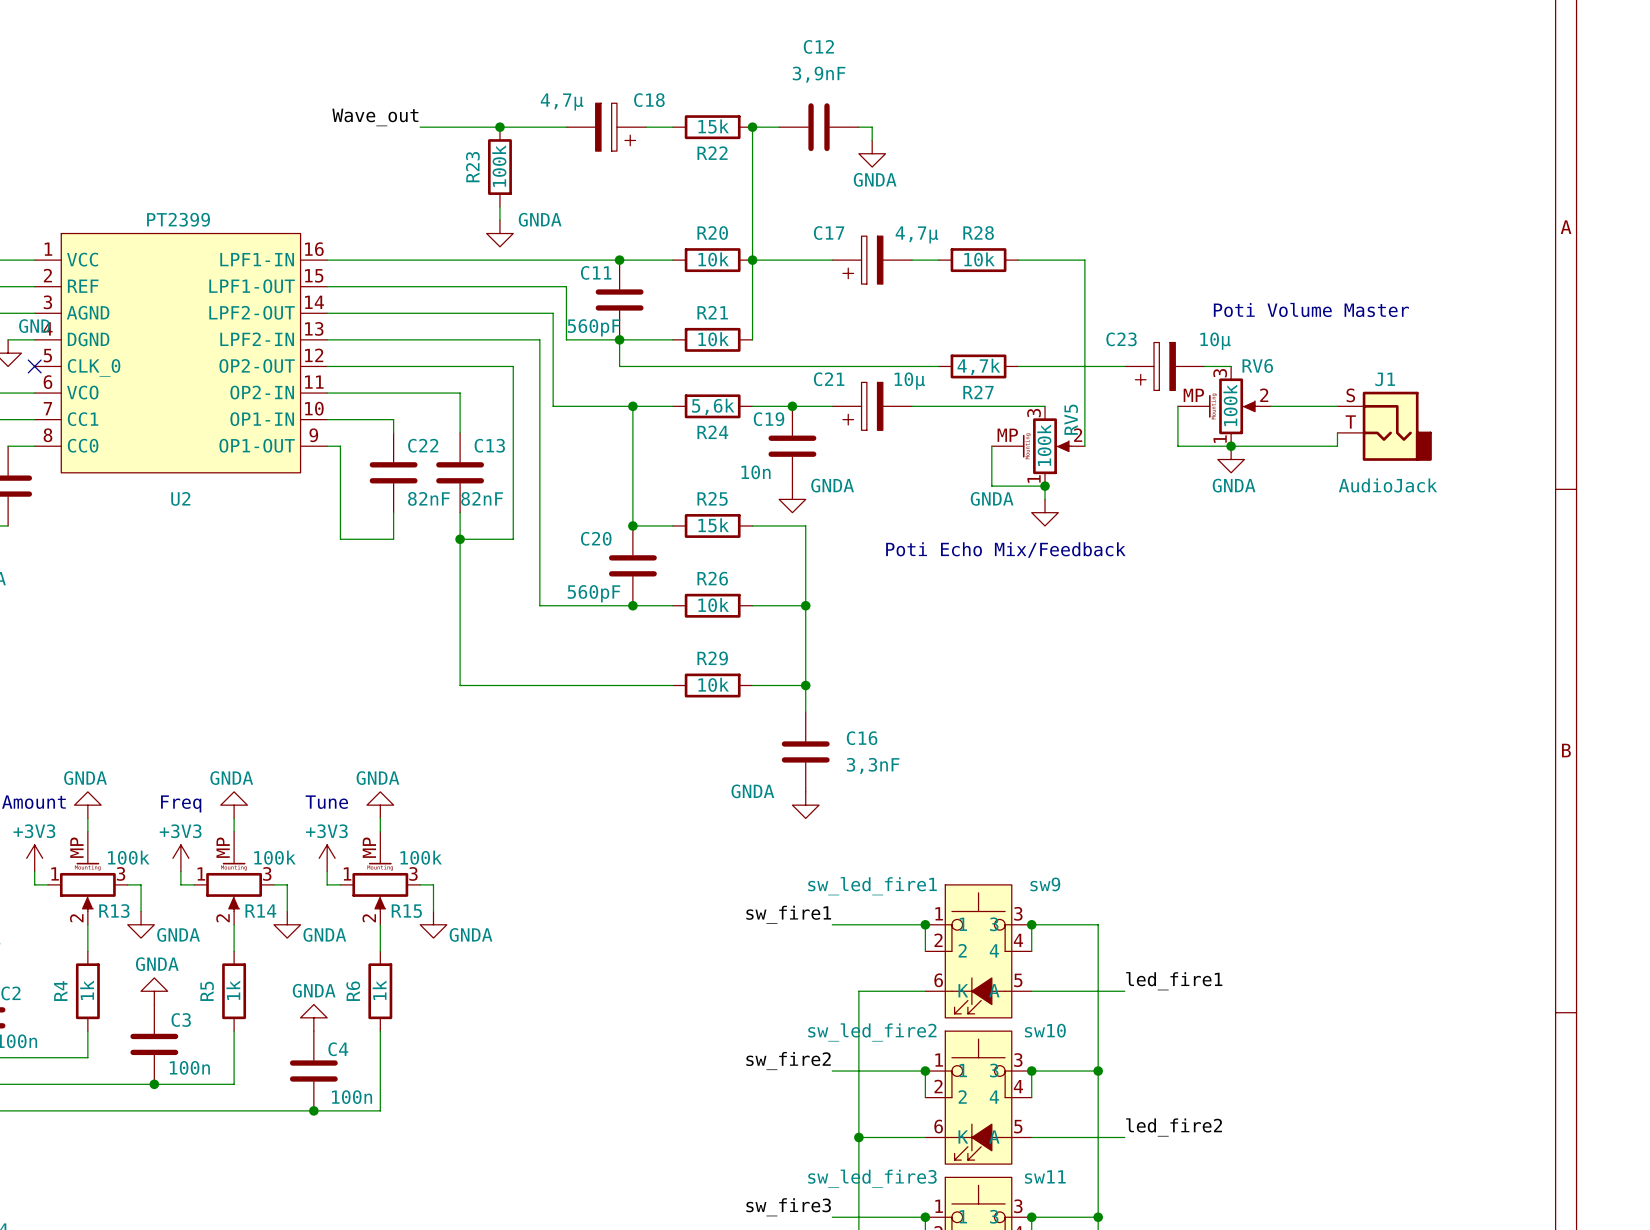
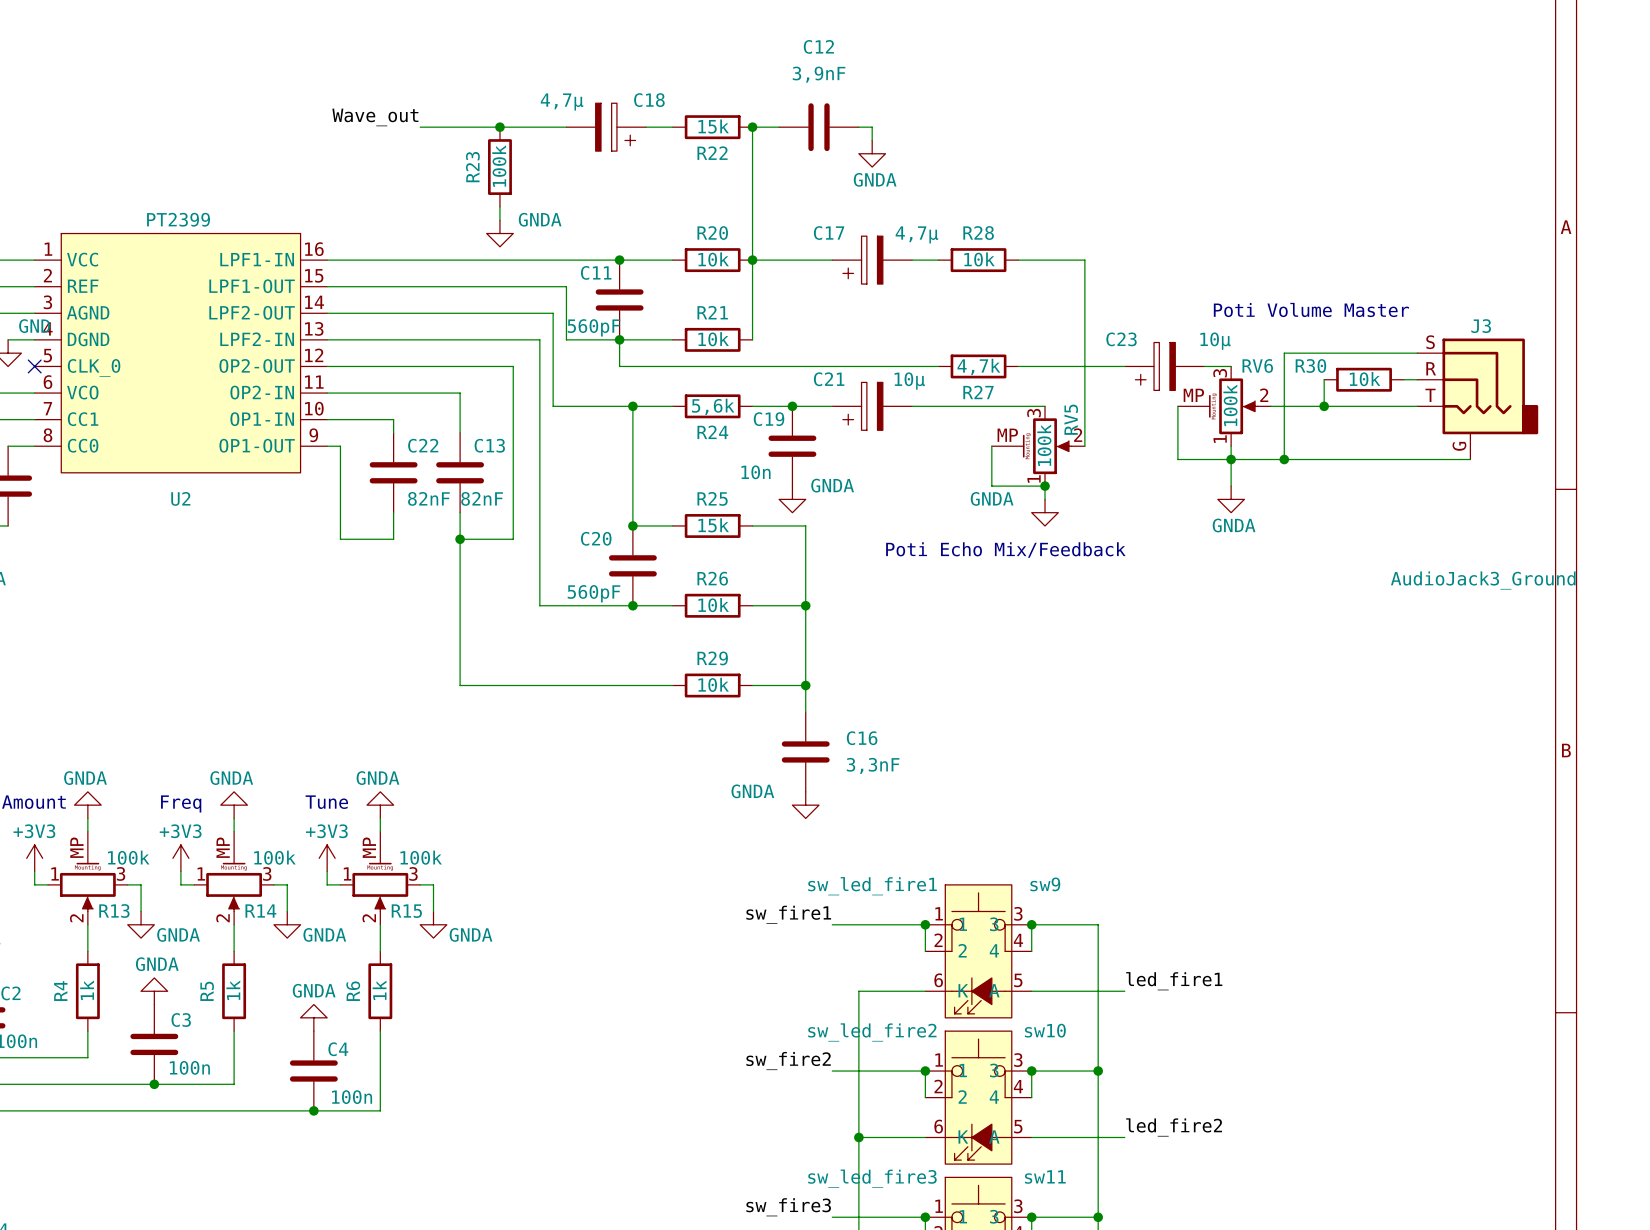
wire: none -> (1417, 353) (1284, 353) (1284, 459)
wire: none -> (1324, 379) (1324, 406)
R30: none -> 10k (1364, 379)
wire: none -> (1403, 379) (1417, 379)
J3: none -> AudioJack3_Ground (1477, 399)
junction: none -> (1324, 406)
J1: AudioJack (1384, 426) -> none
wire: (1337, 432) (1337, 446) (1177, 446) -> (1470, 459) (1177, 459) (1177, 446)
junction position: (1231, 446) -> (1231, 459)
power symbol position: GNDA (1231, 459) -> GNDA (1231, 499)
junction: none -> (1284, 459)

